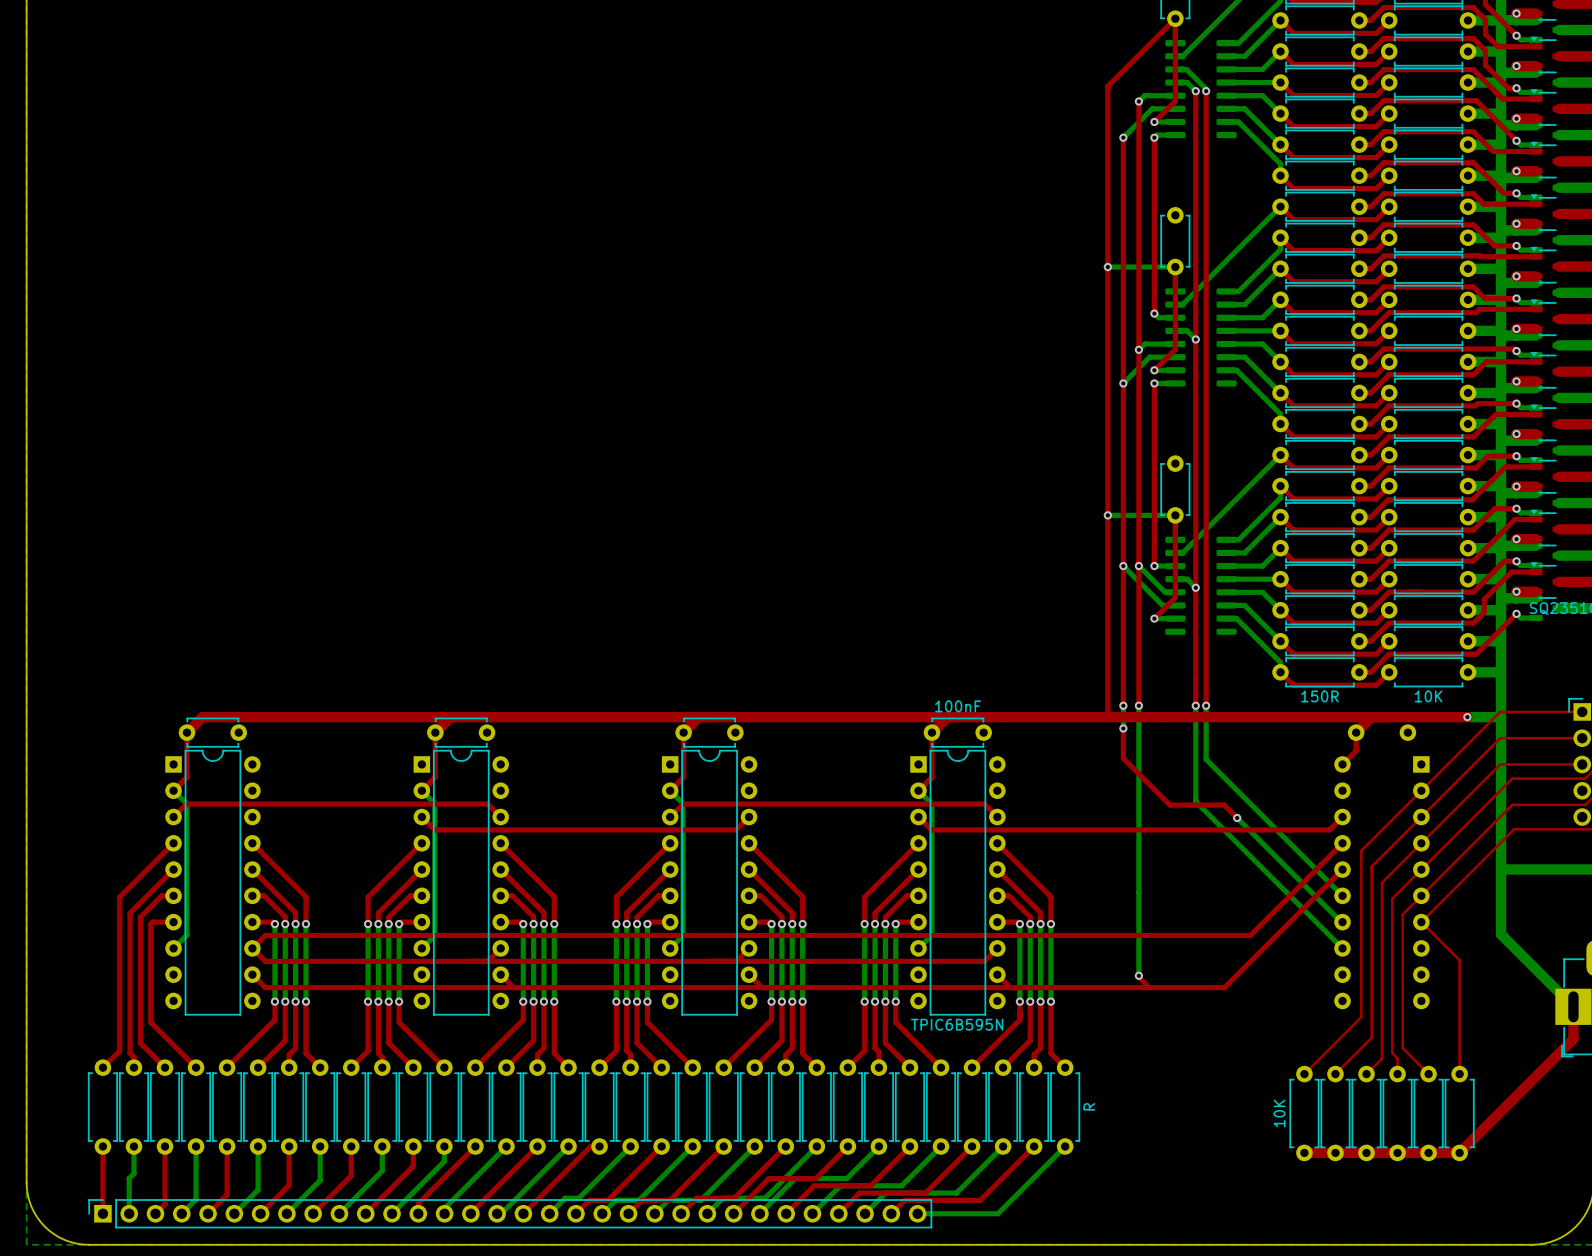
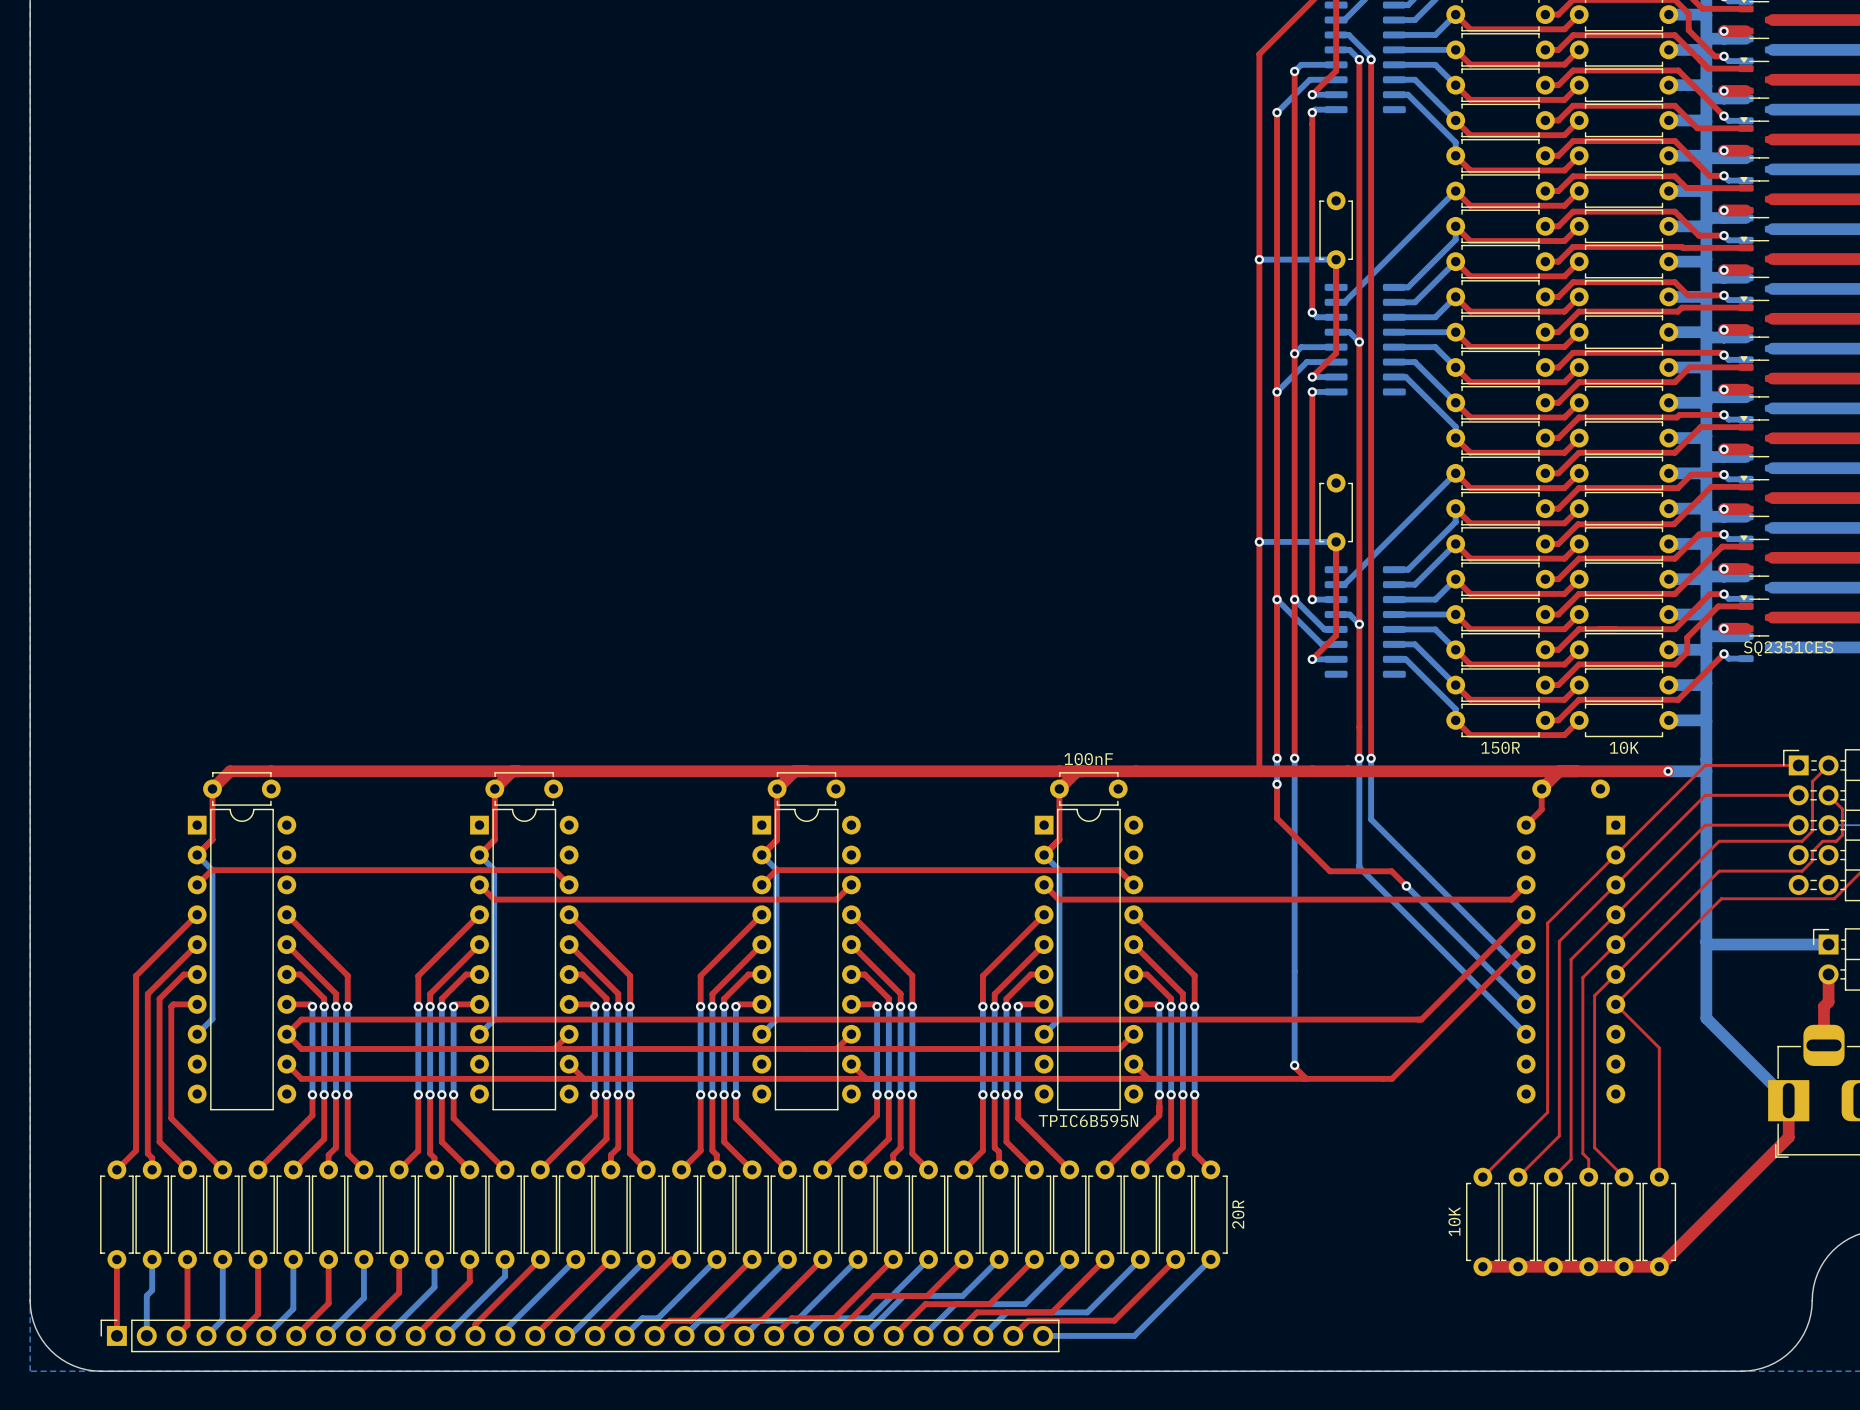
part value: R (1089, 1106) -> 20R (1238, 1214)

